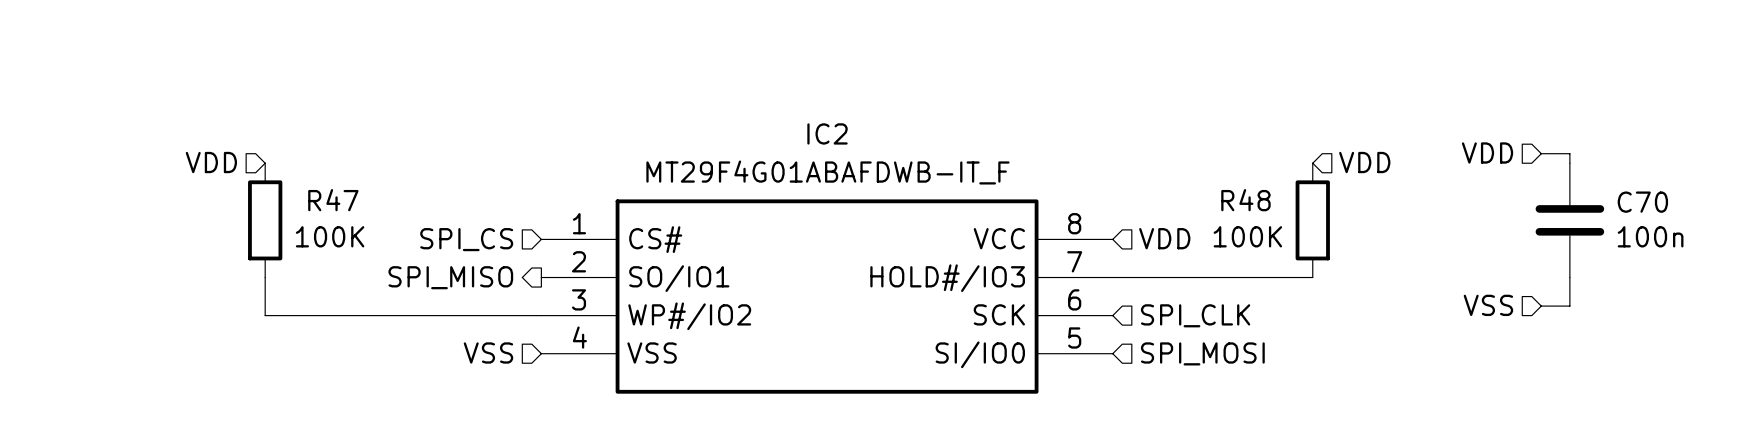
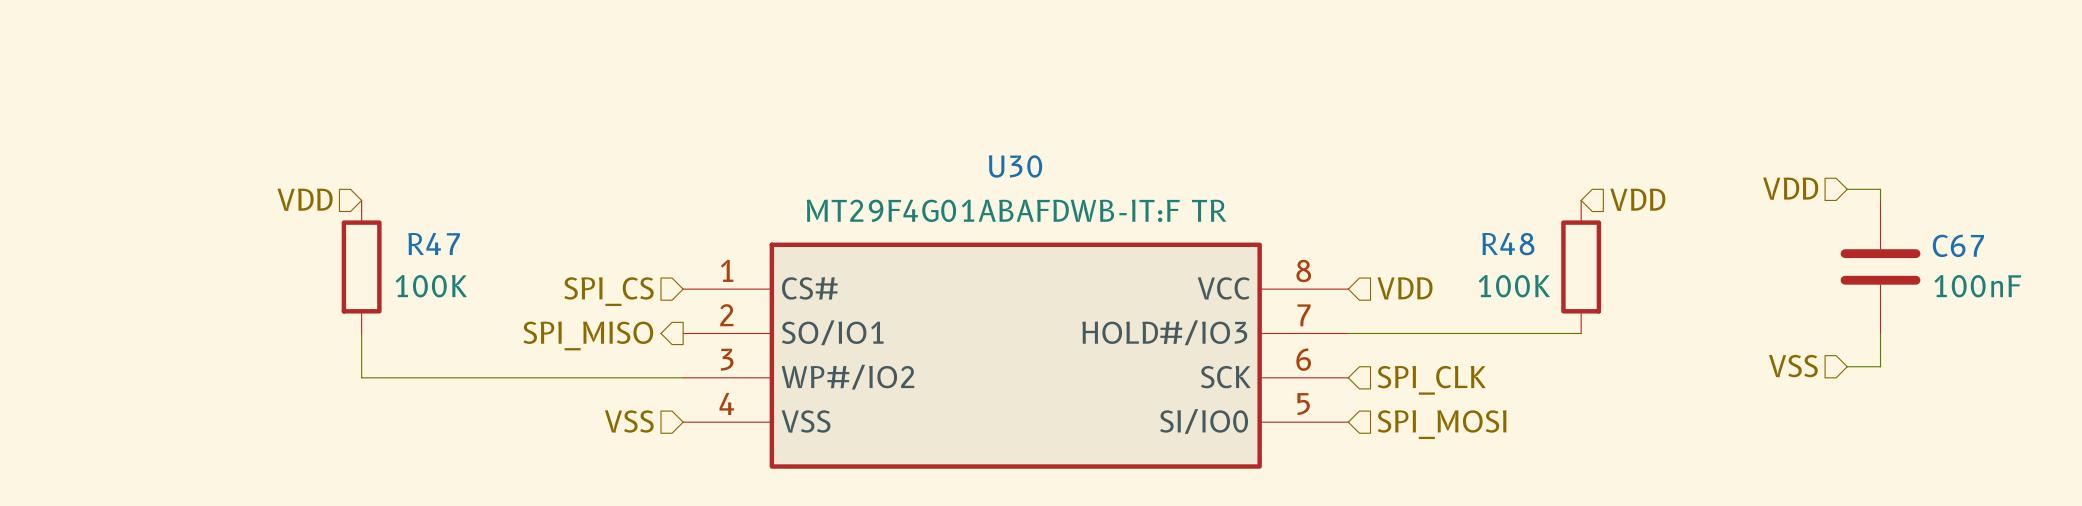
IC2 name: IC2 (827, 133) -> U30 (1015, 166)
IC2 value: MT29F4G01ABAFDWB-IT_F (827, 172) -> MT29F4G01ABAFDWB-IT:F TR (1016, 210)
C70 name: C70 (1642, 202) -> C67 (1958, 245)
C70 value: 100n (1650, 236) -> 100nF (1977, 286)

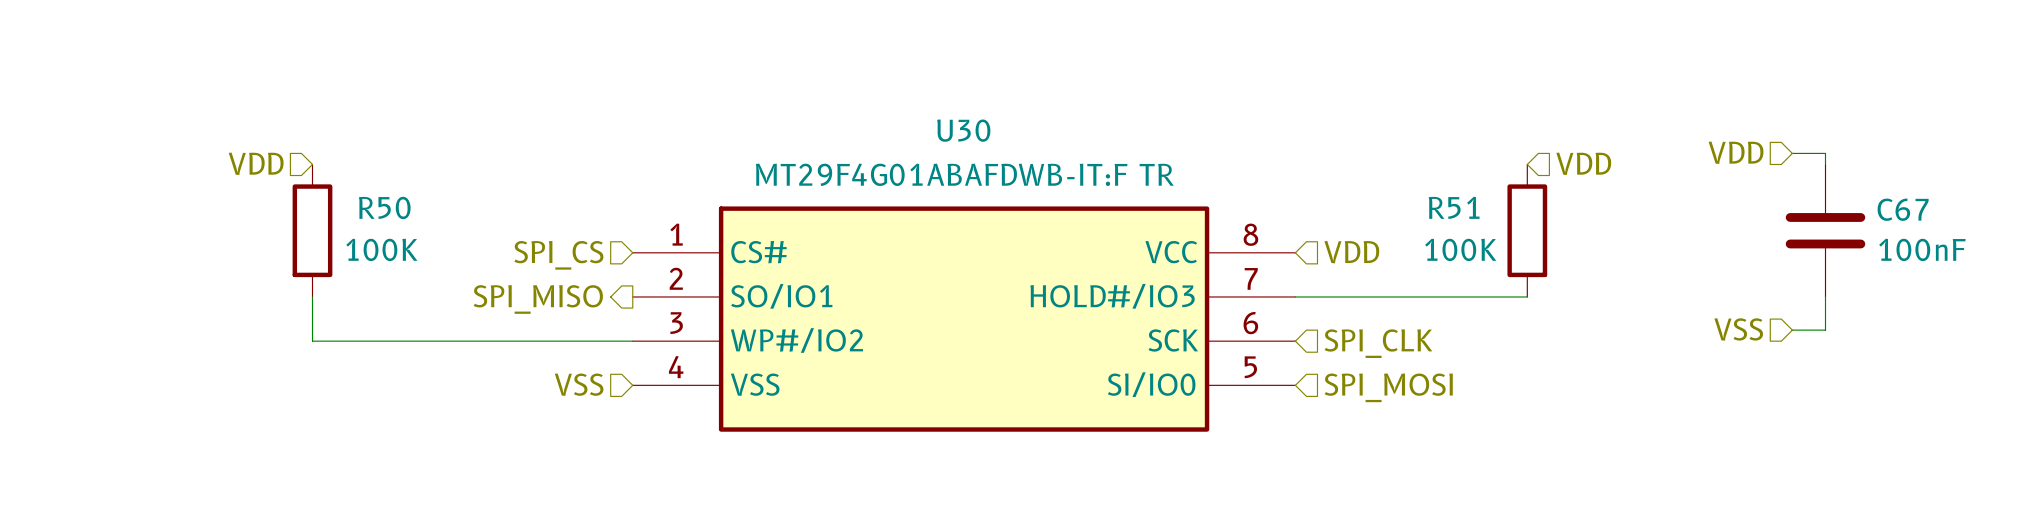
R47 name: R47 (434, 243) -> R50 (384, 207)
R48 name: R48 (1508, 244) -> R51 (1454, 207)

